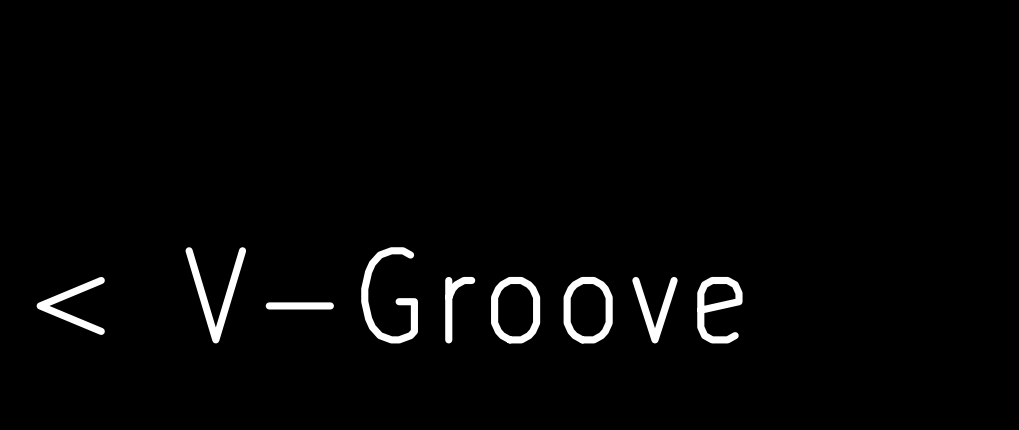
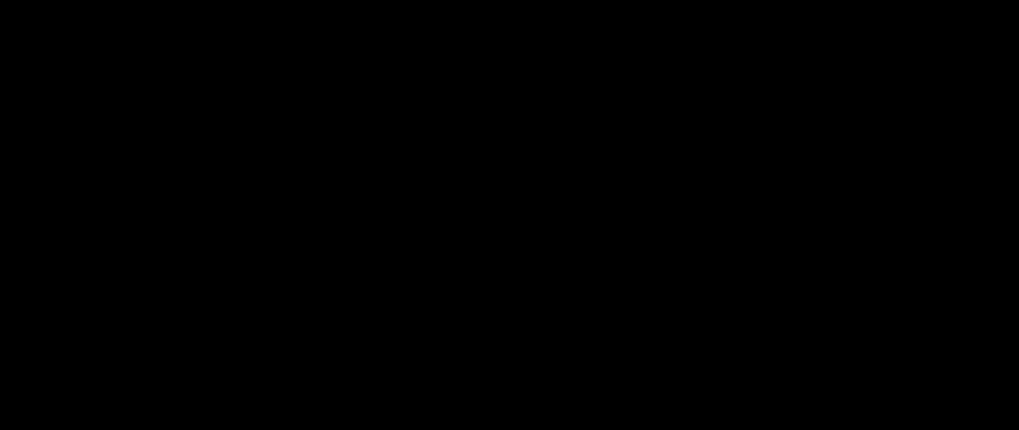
text: < V-Groove (389, 295) -> none

